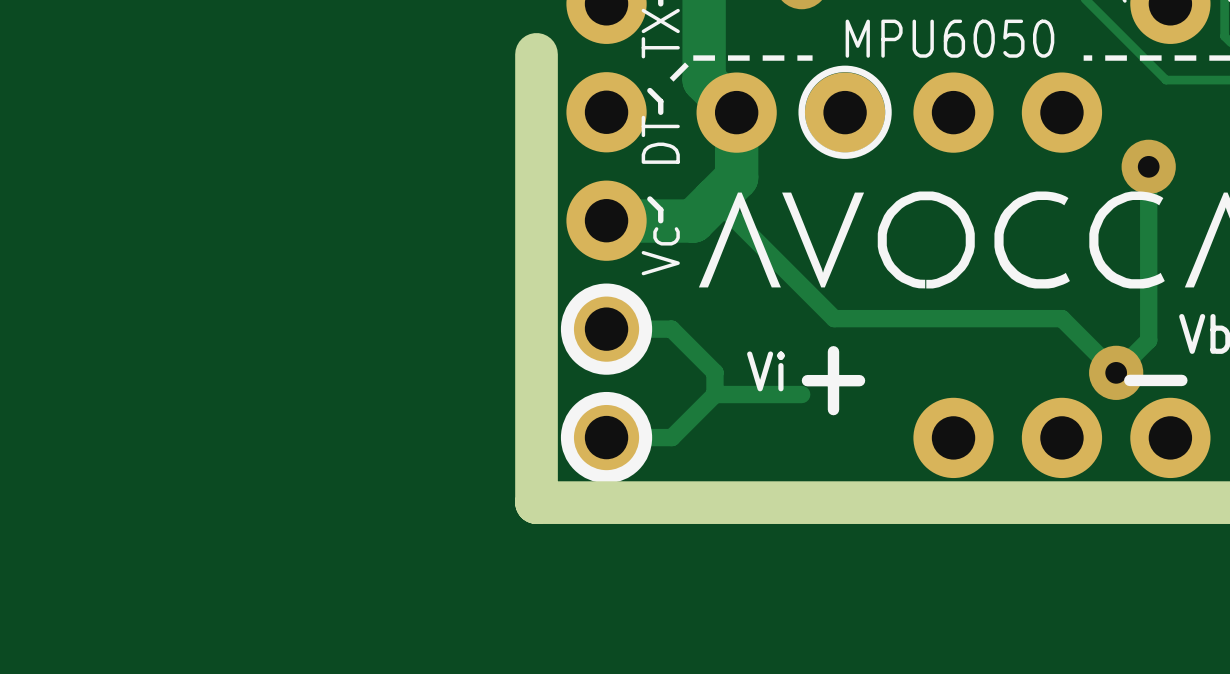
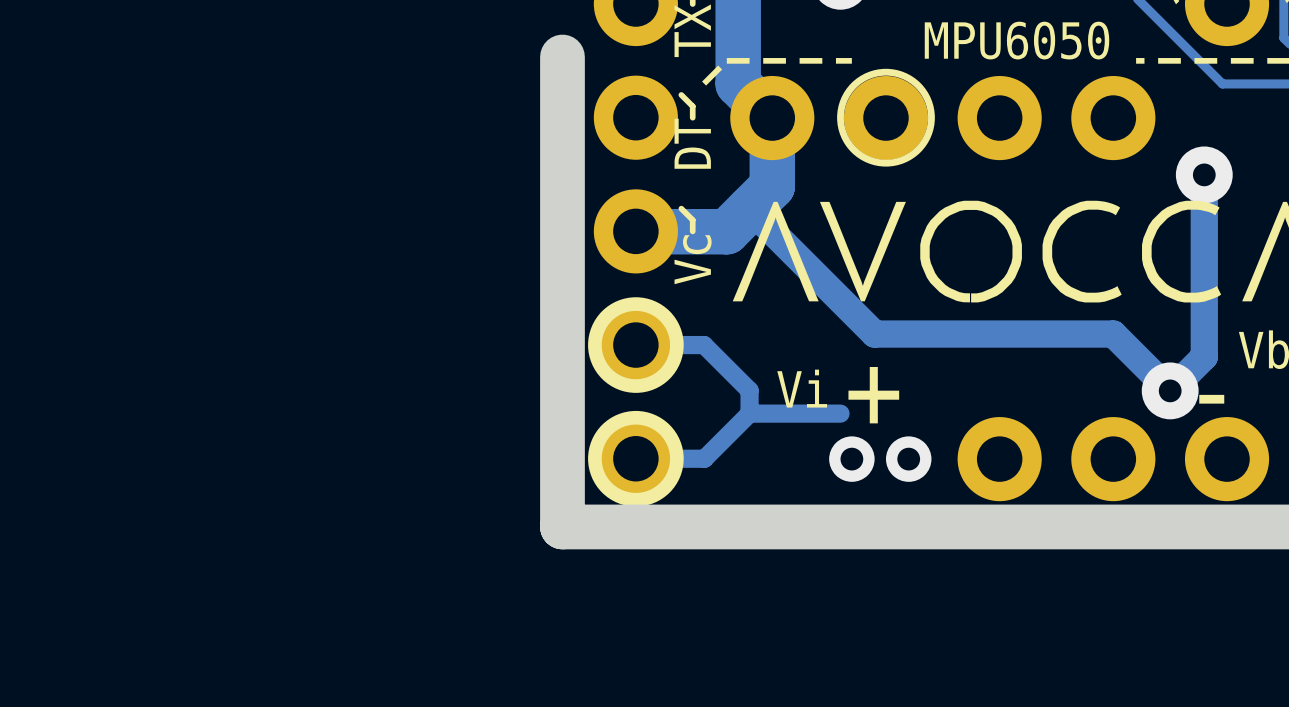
track width: thin (1148, 166) (1148, 340) (1116, 372) (1061, 318) (834, 318) (714, 199) -> thick (1204, 174) (1204, 356) (1170, 390) (1113, 334) (874, 334) (749, 209)
via: none -> (851, 459)
via: none -> (908, 459)

